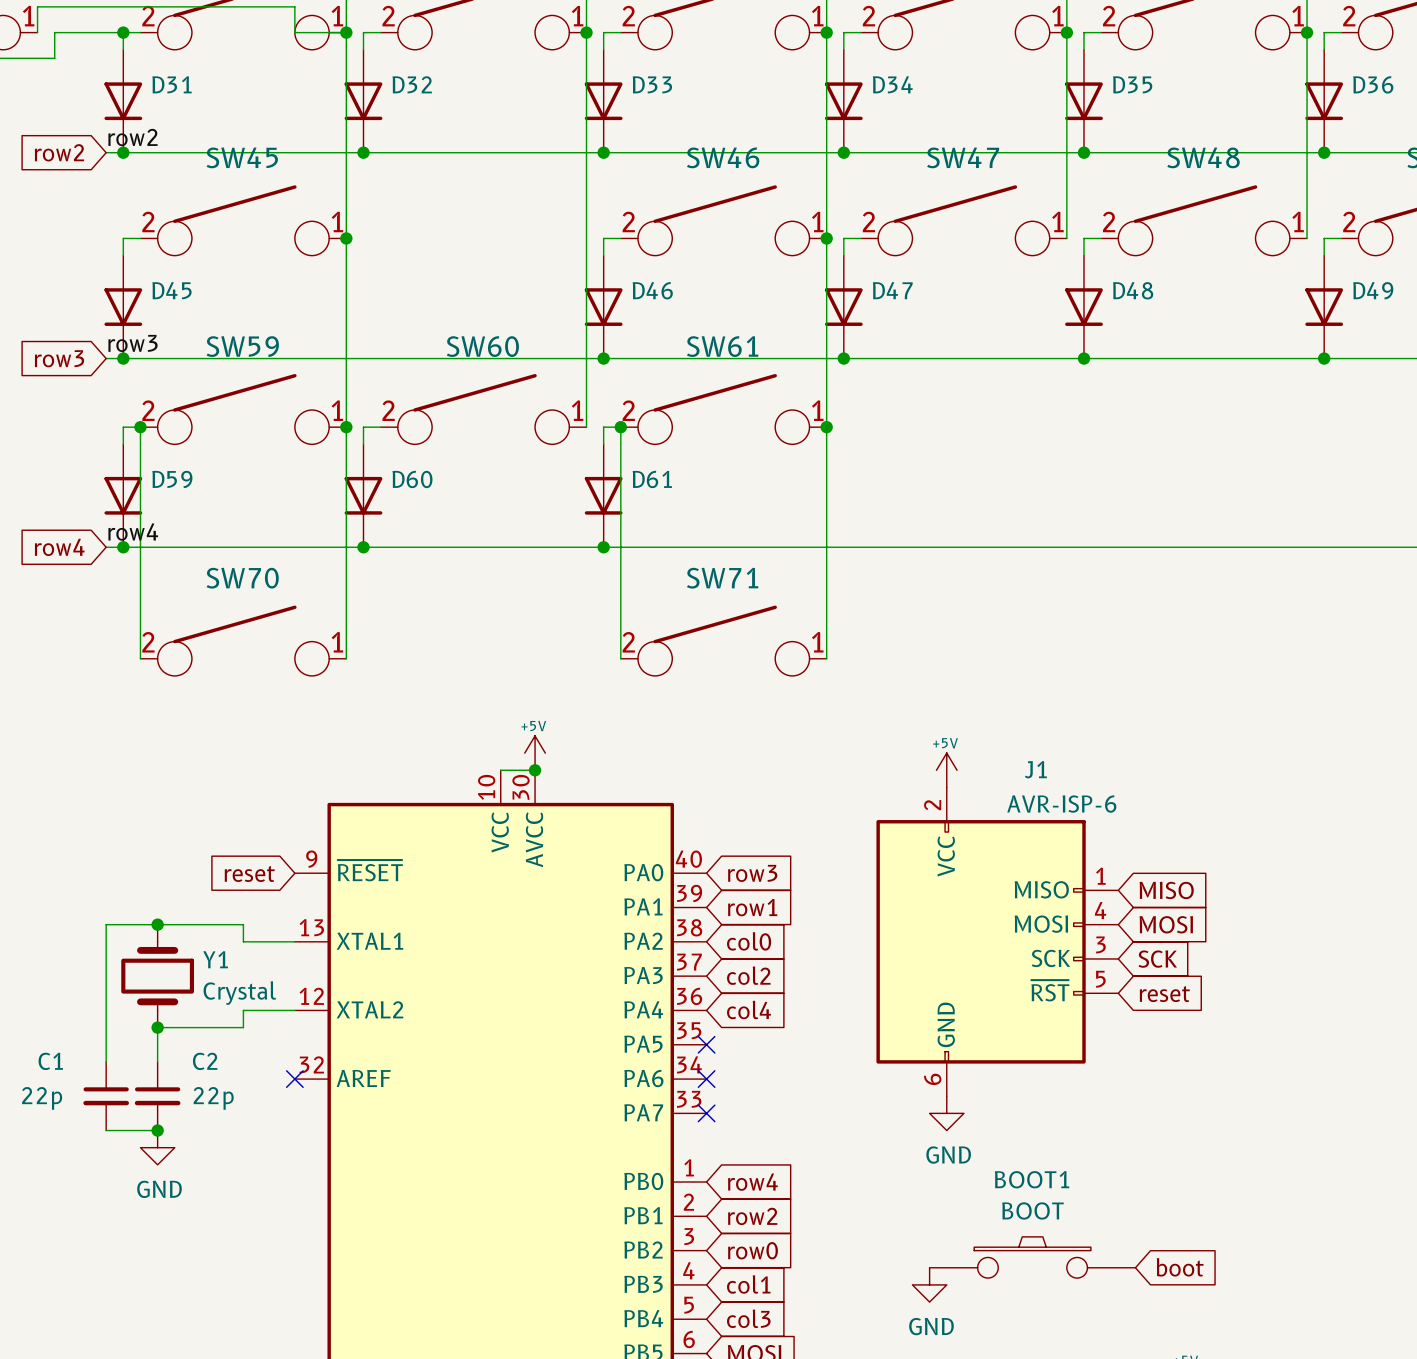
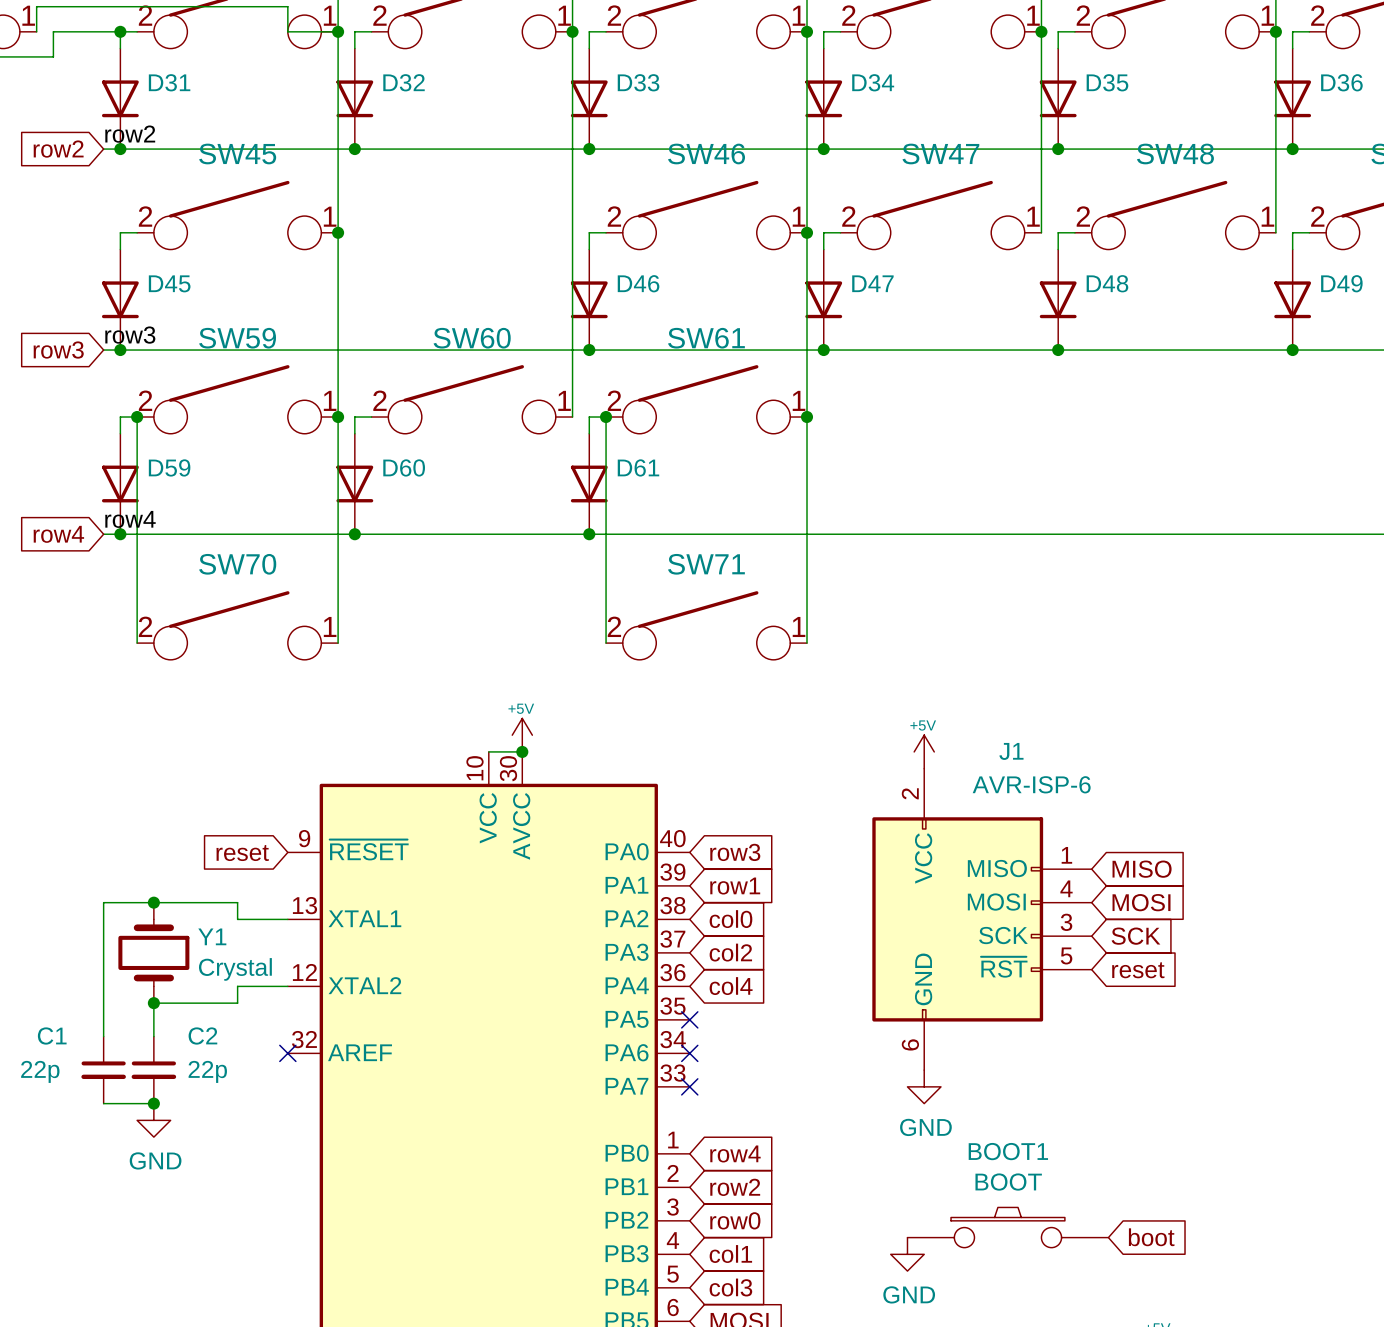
J1 symbol: [876, 787, 1119, 1097] -> [872, 768, 1092, 1071]

